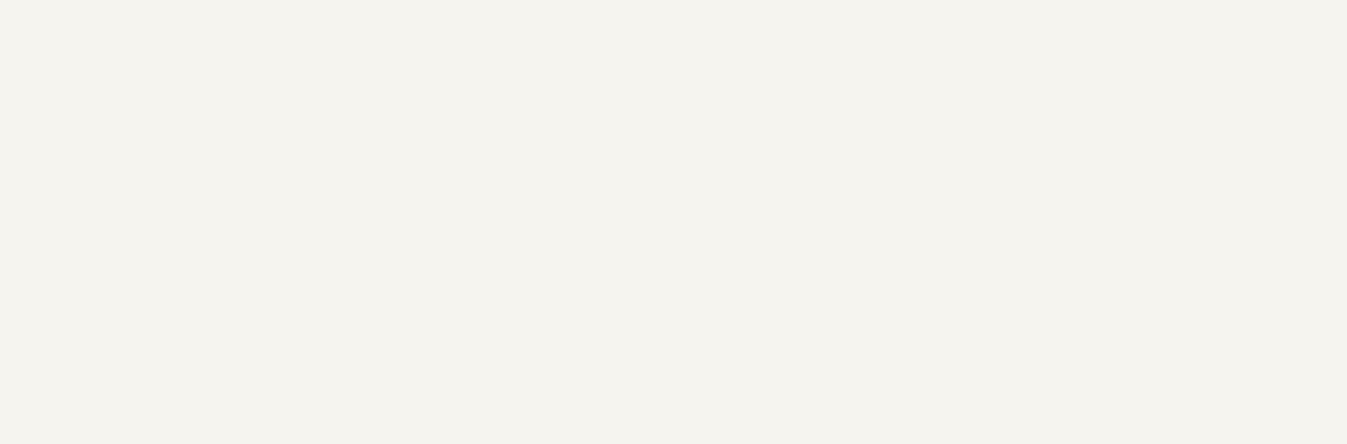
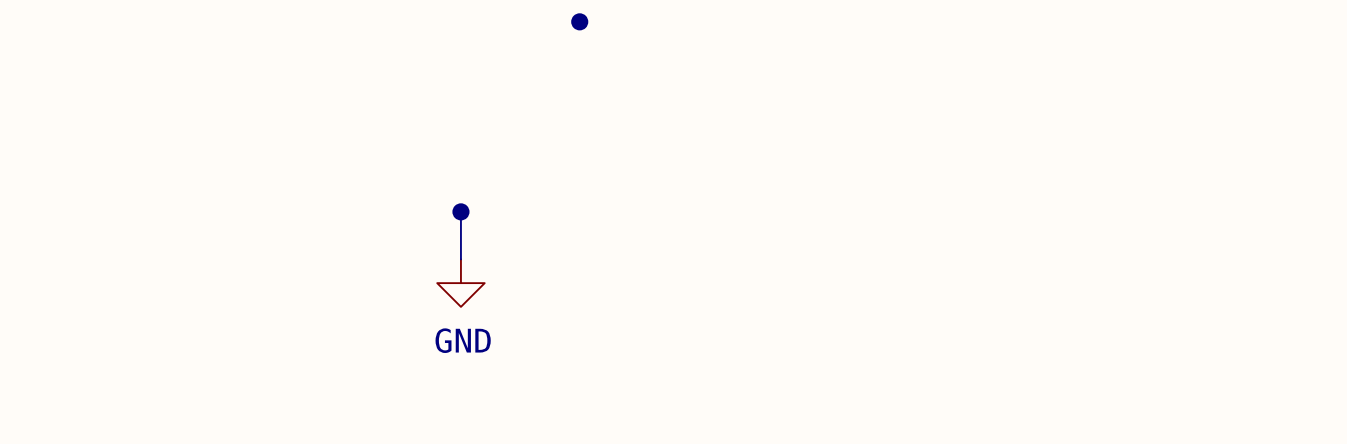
junction: none -> (579, 21)
wire: none -> (460, 211) (460, 259)
junction: none -> (460, 211)
power symbol: none -> GND (460, 283)

